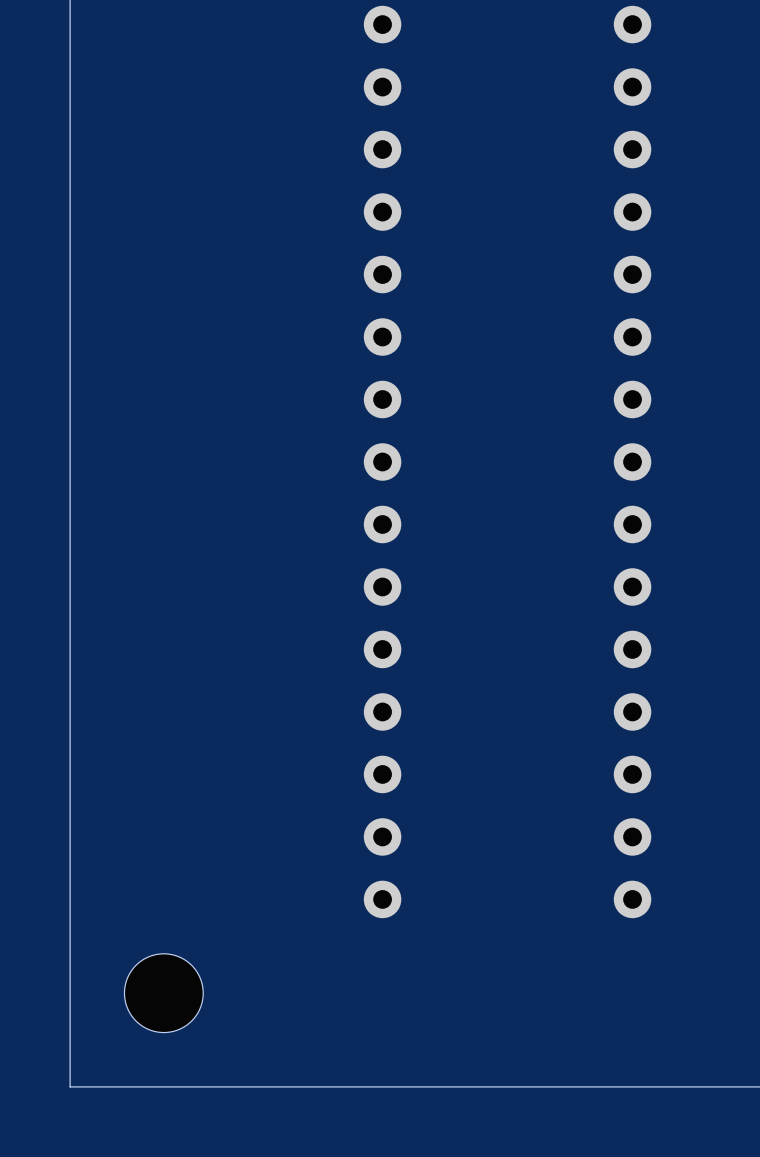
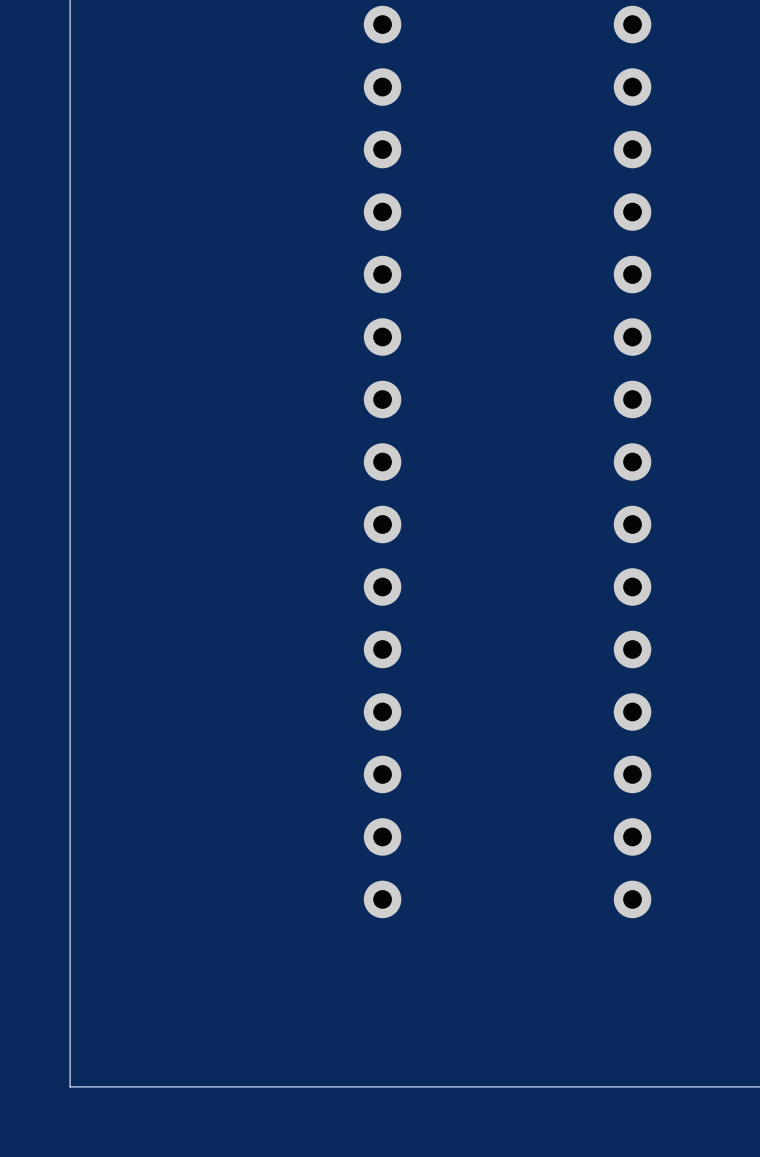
part: (163, 993) -> none

